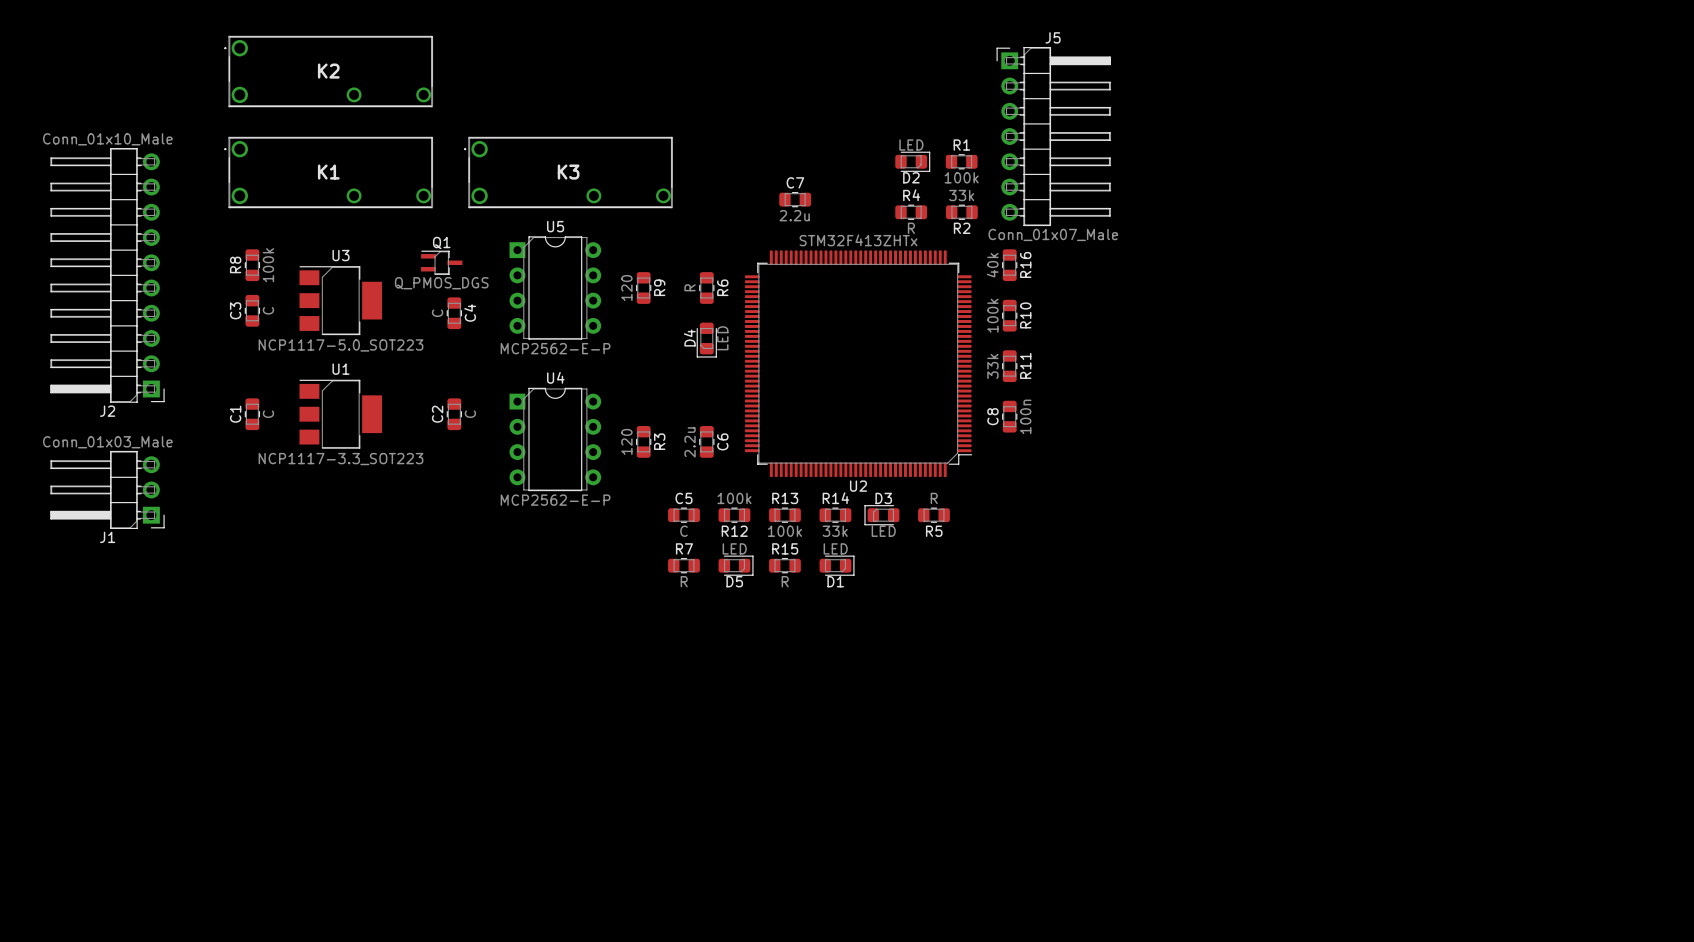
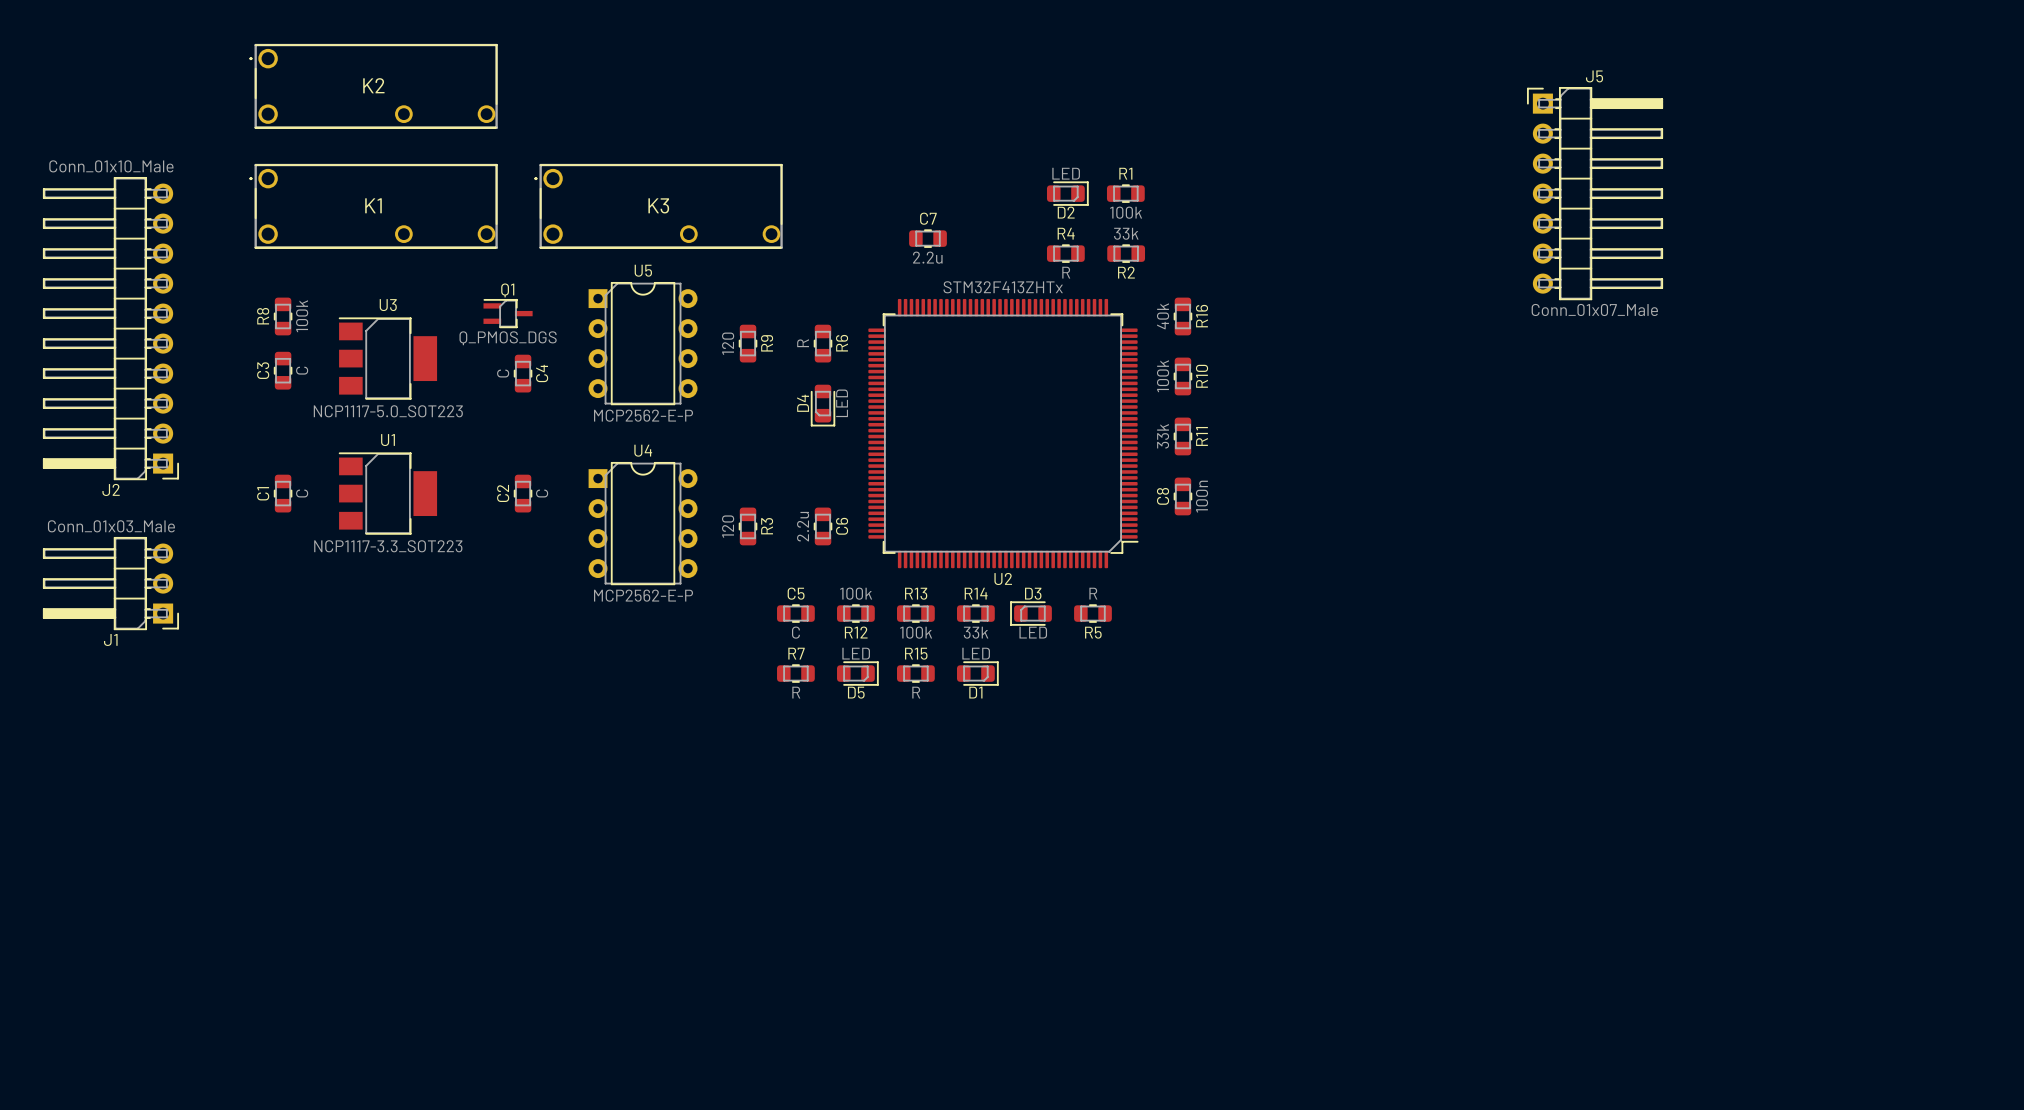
J5 position: (1053, 136) -> (1595, 193)

